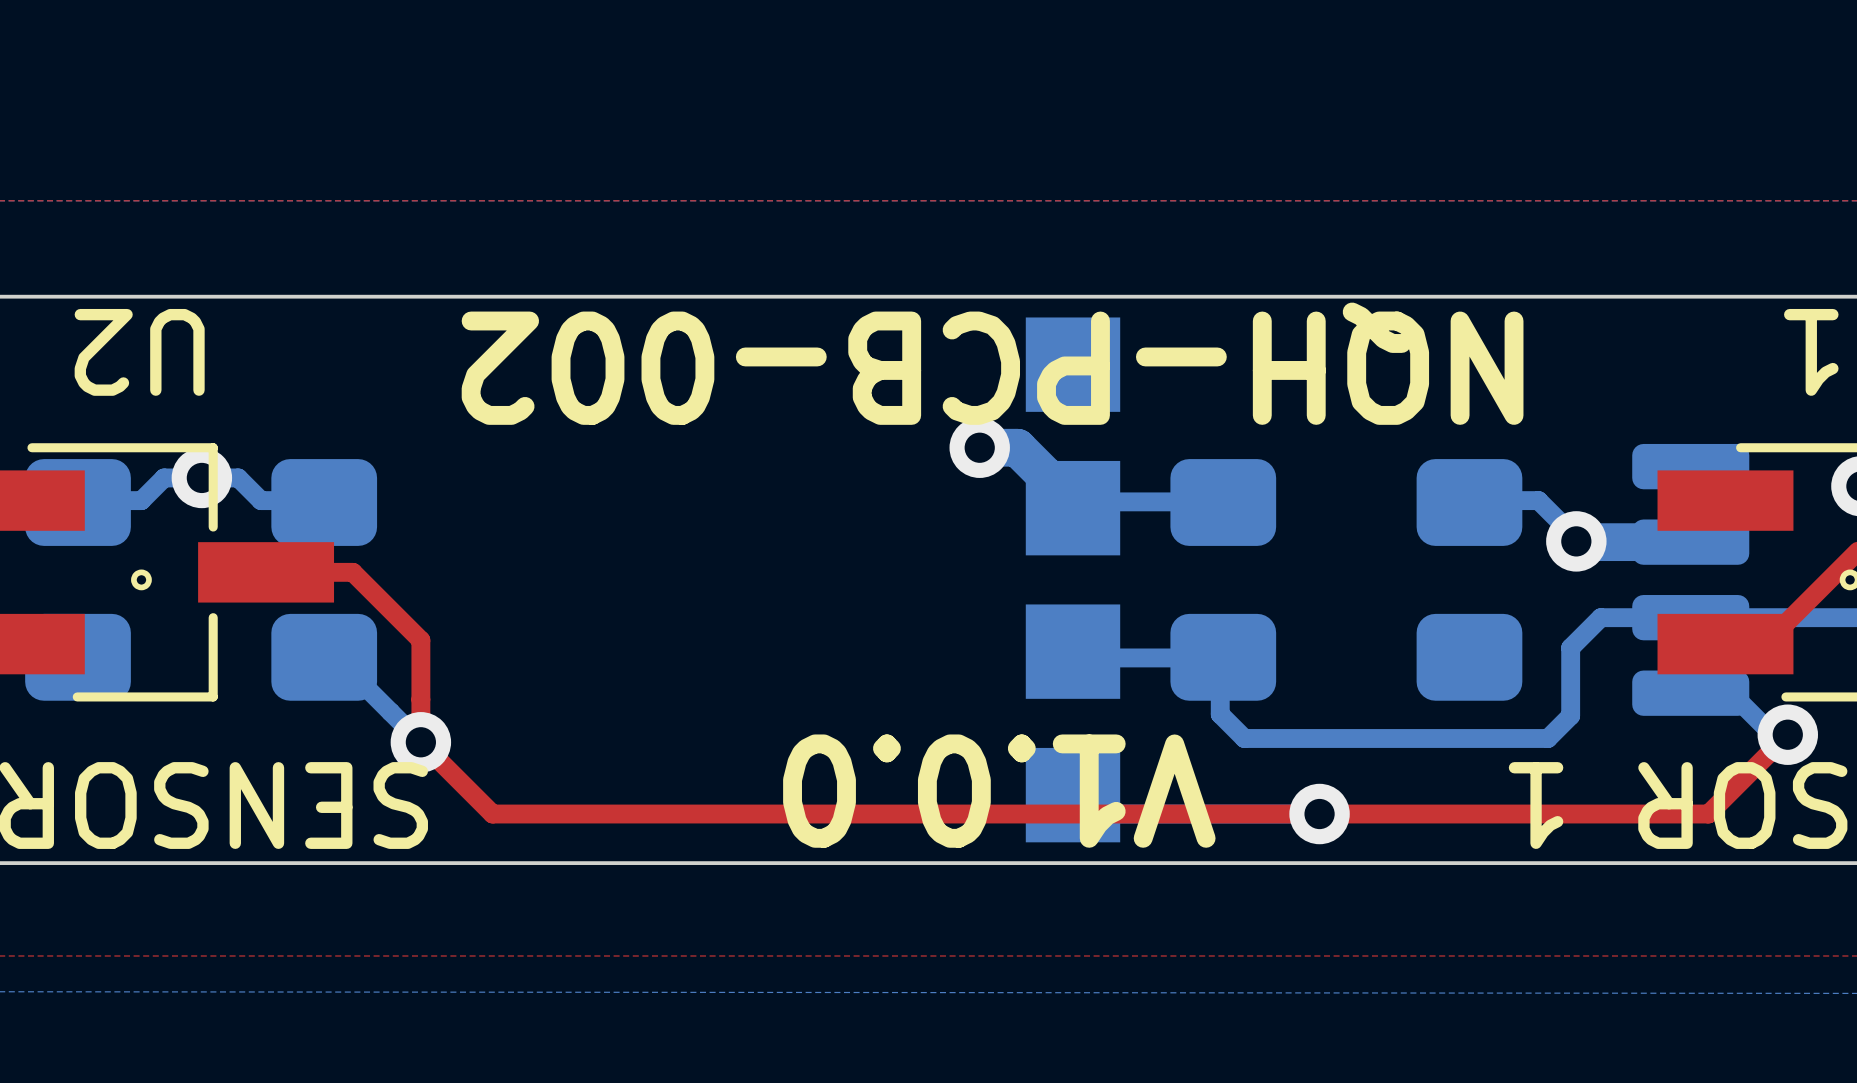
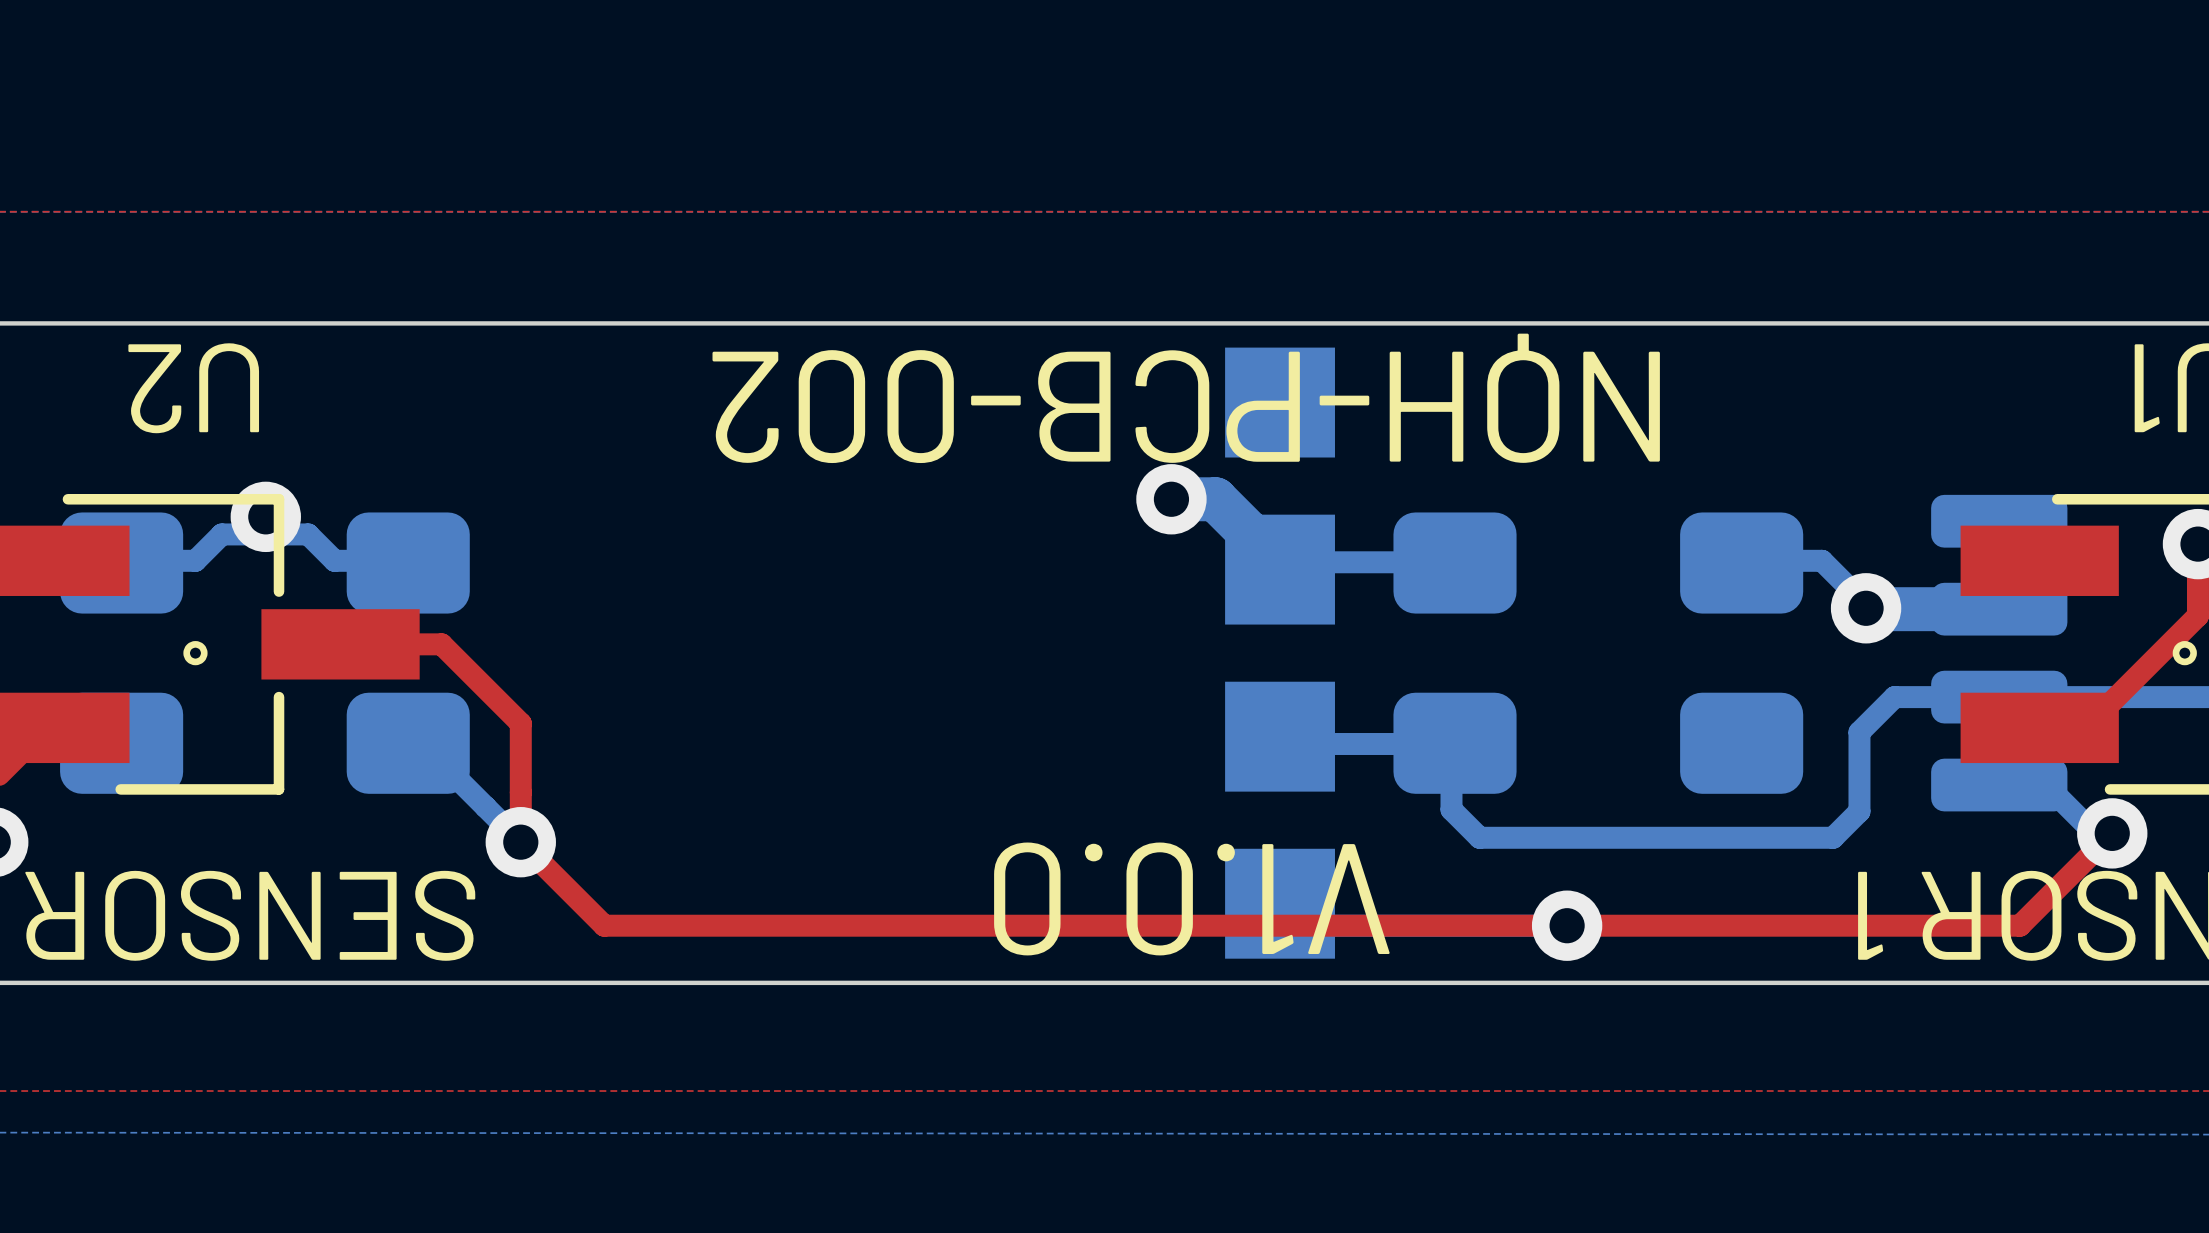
via position: (201, 477) -> (265, 516)

